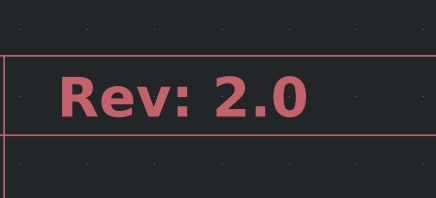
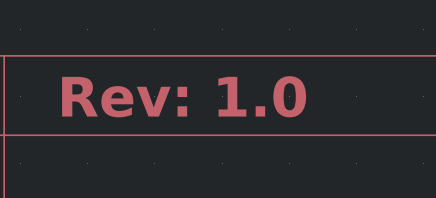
title block: Rev: 2.0 (184, 96) -> Rev: 1.0 (184, 96)

